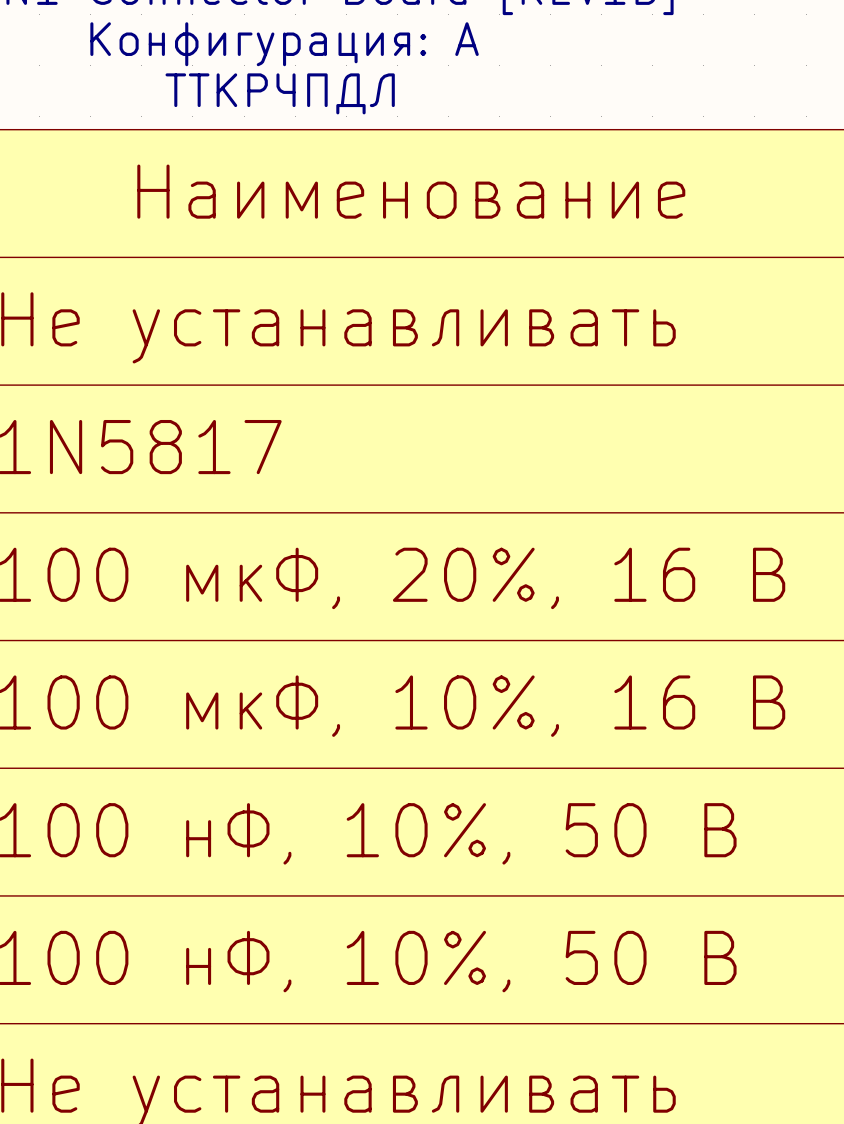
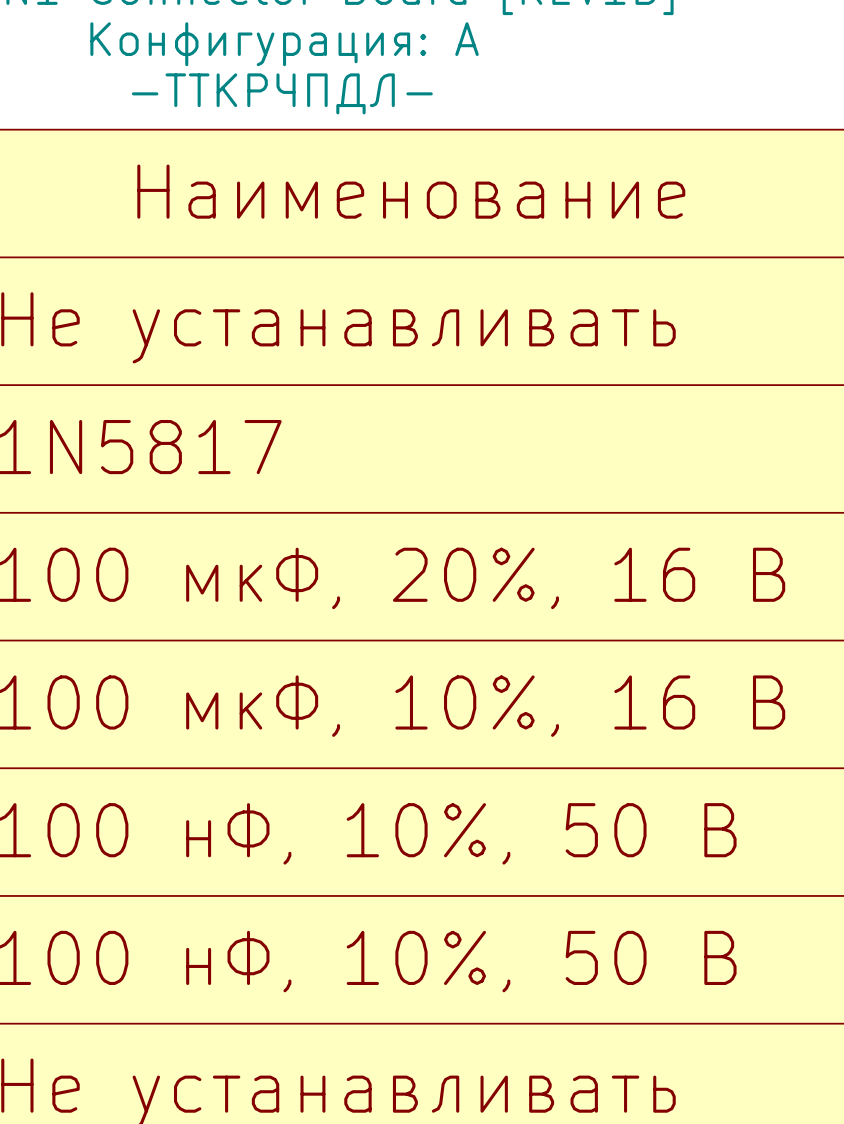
part text: ТТКРЧПДЛ (280, 93) -> -ТТКРЧПДЛ- (282, 93)

